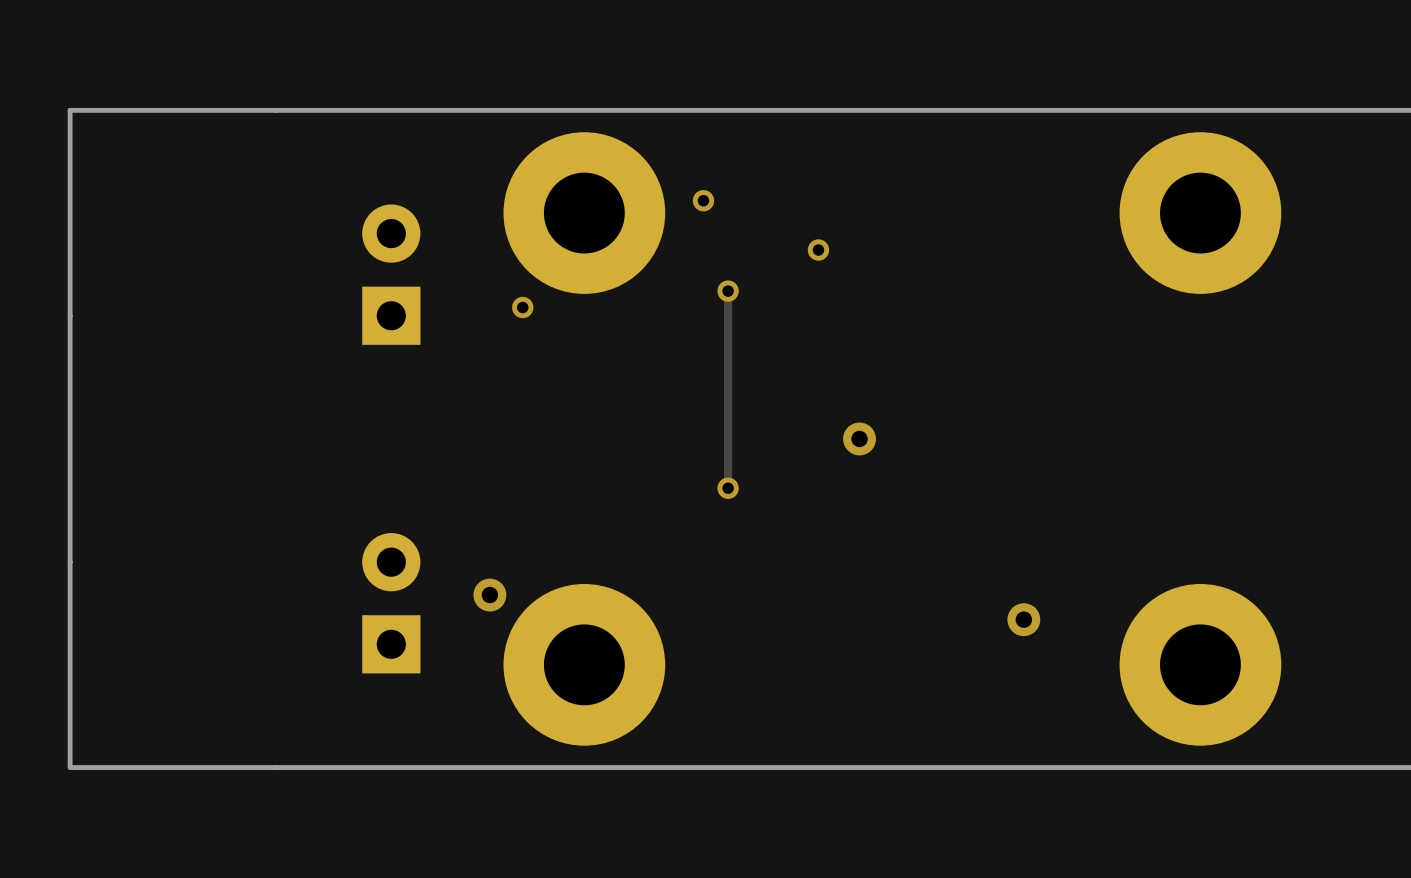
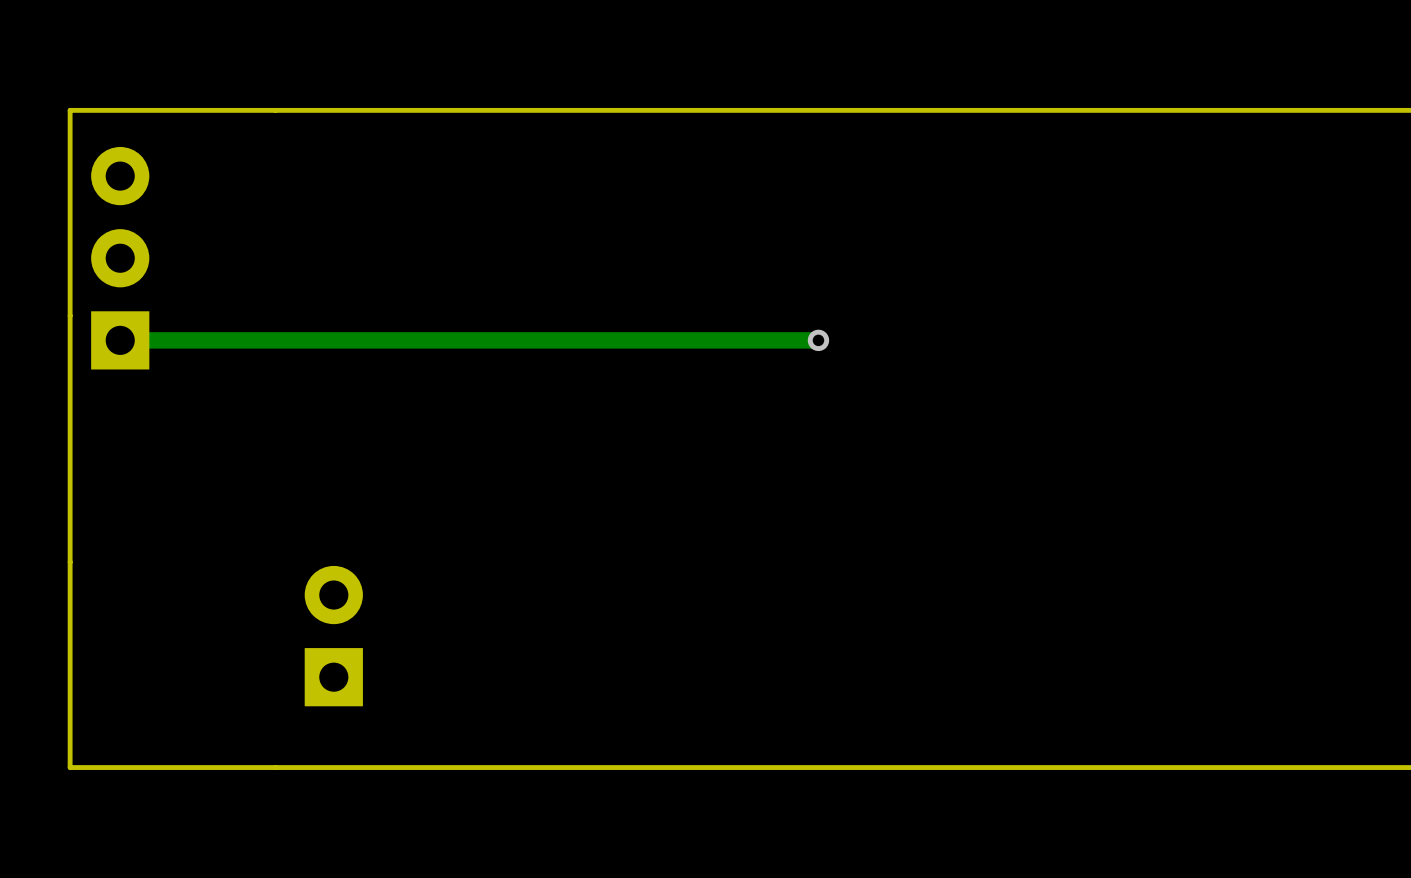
via: (703, 200) -> none
part: (584, 213) -> none
part: (1200, 213) -> none
via: (818, 250) -> none
part: none -> (120, 258)
part: (391, 274) -> none
track: (728, 291) (728, 488) -> none
via: (728, 291) -> none
via: (522, 307) -> none
track: none -> (818, 340) (120, 340)
via: none -> (818, 340)
via: (859, 438) -> none
via: (728, 488) -> none
via: (489, 595) -> none
part position: (391, 603) -> (333, 636)
via: (1023, 619) -> none
part: (584, 664) -> none
part: (1200, 664) -> none

